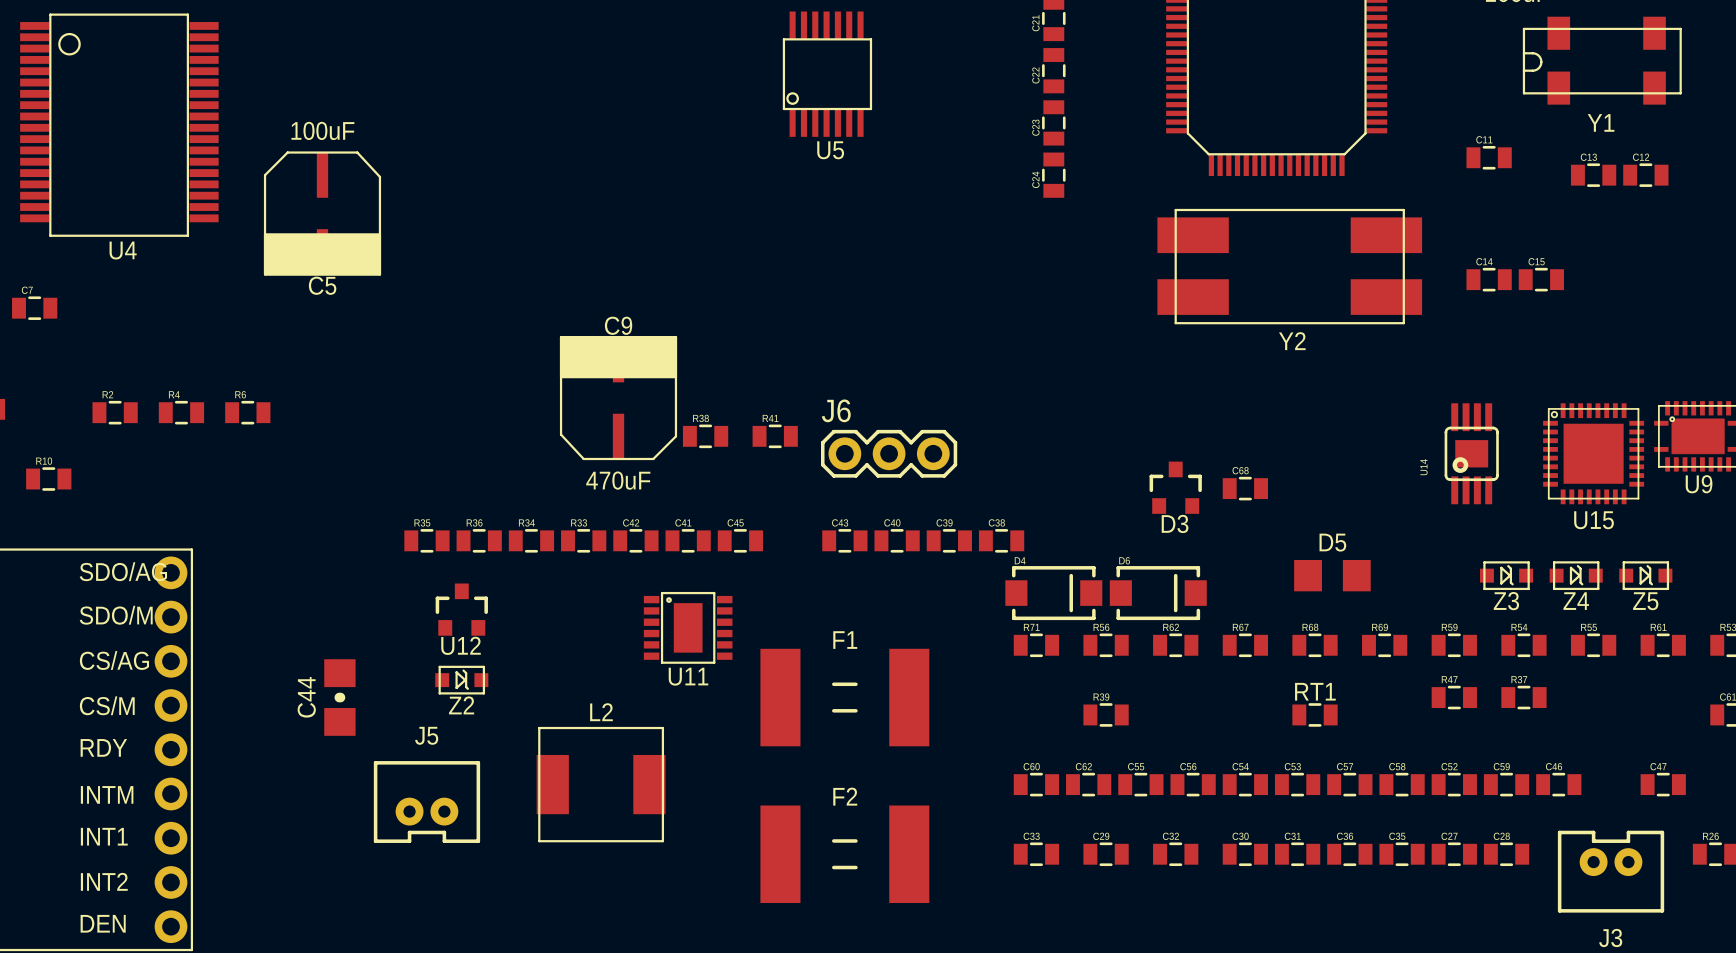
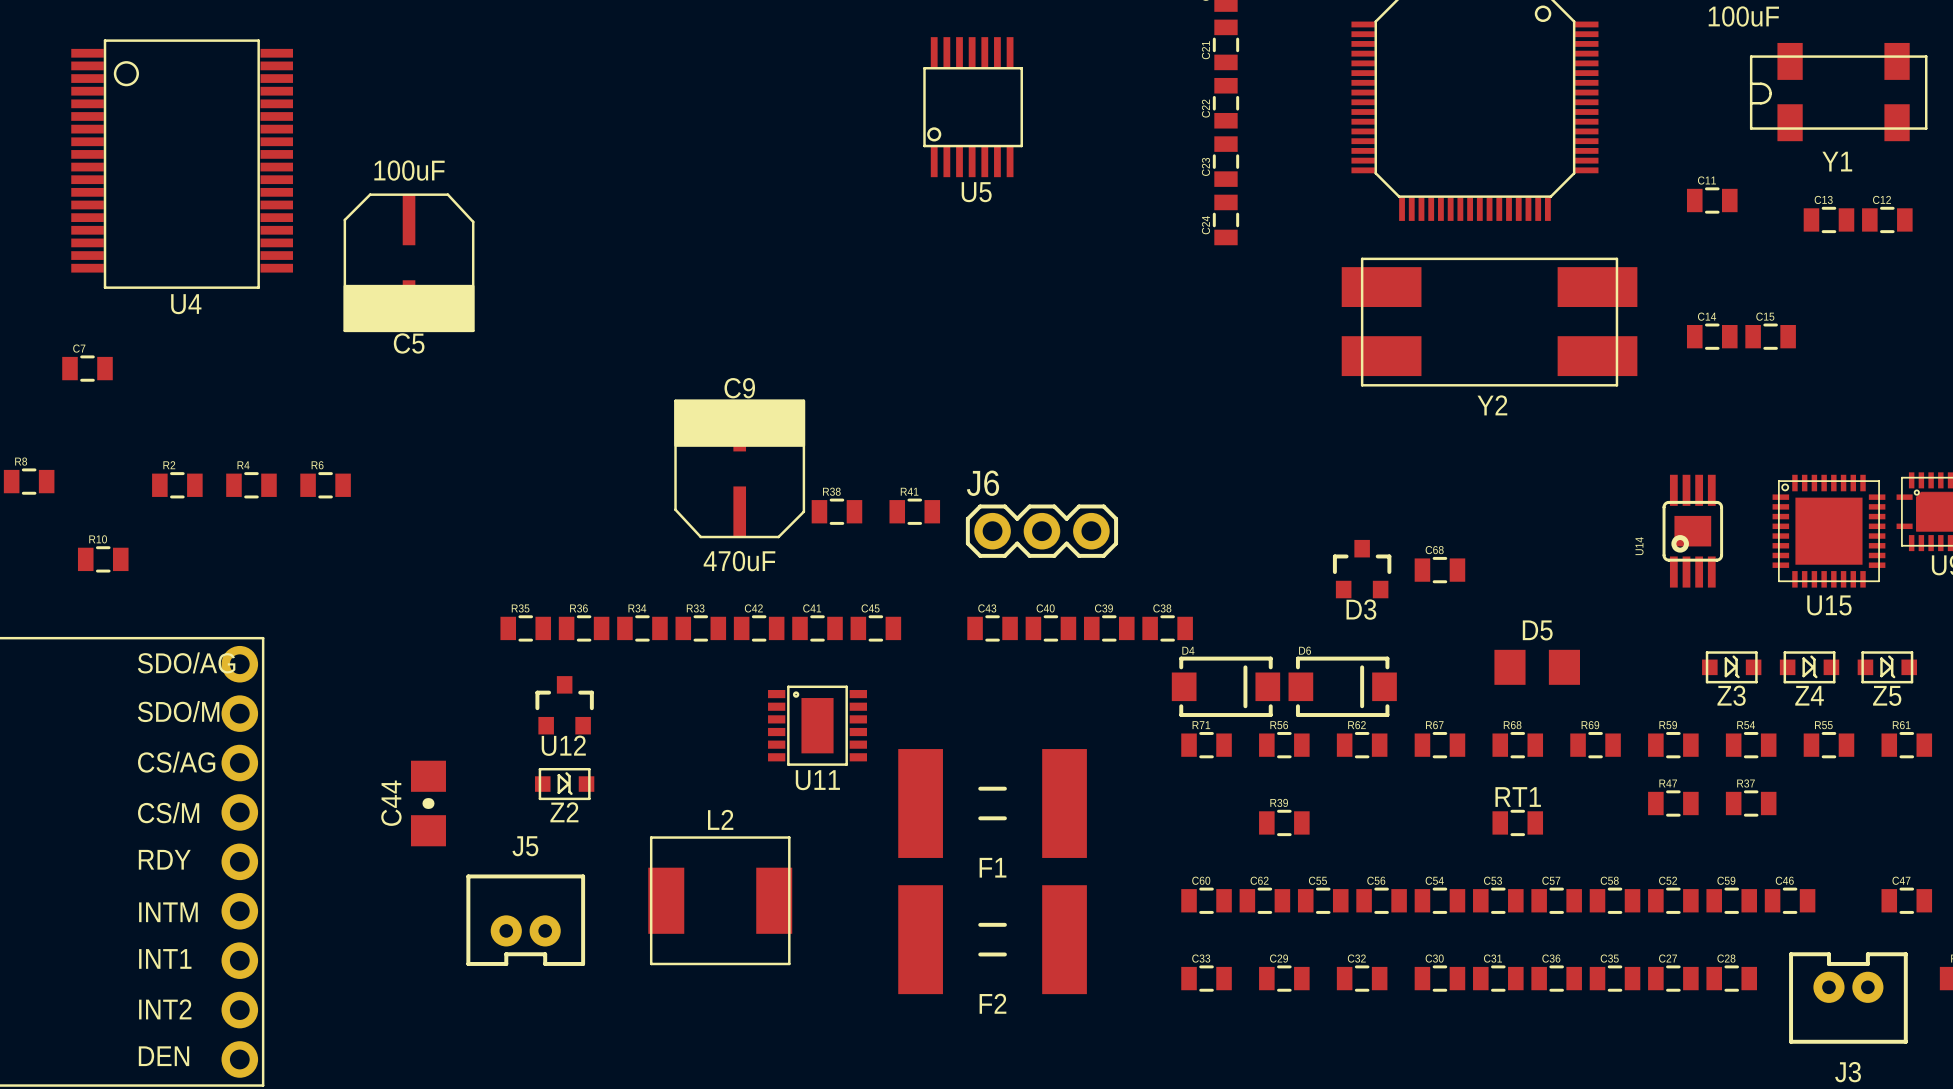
F1 name position: F1 (845, 640) -> F1 (993, 867)
F2 name position: F2 (845, 796) -> F2 (992, 1003)
F2 position: (844, 854) -> (992, 939)

